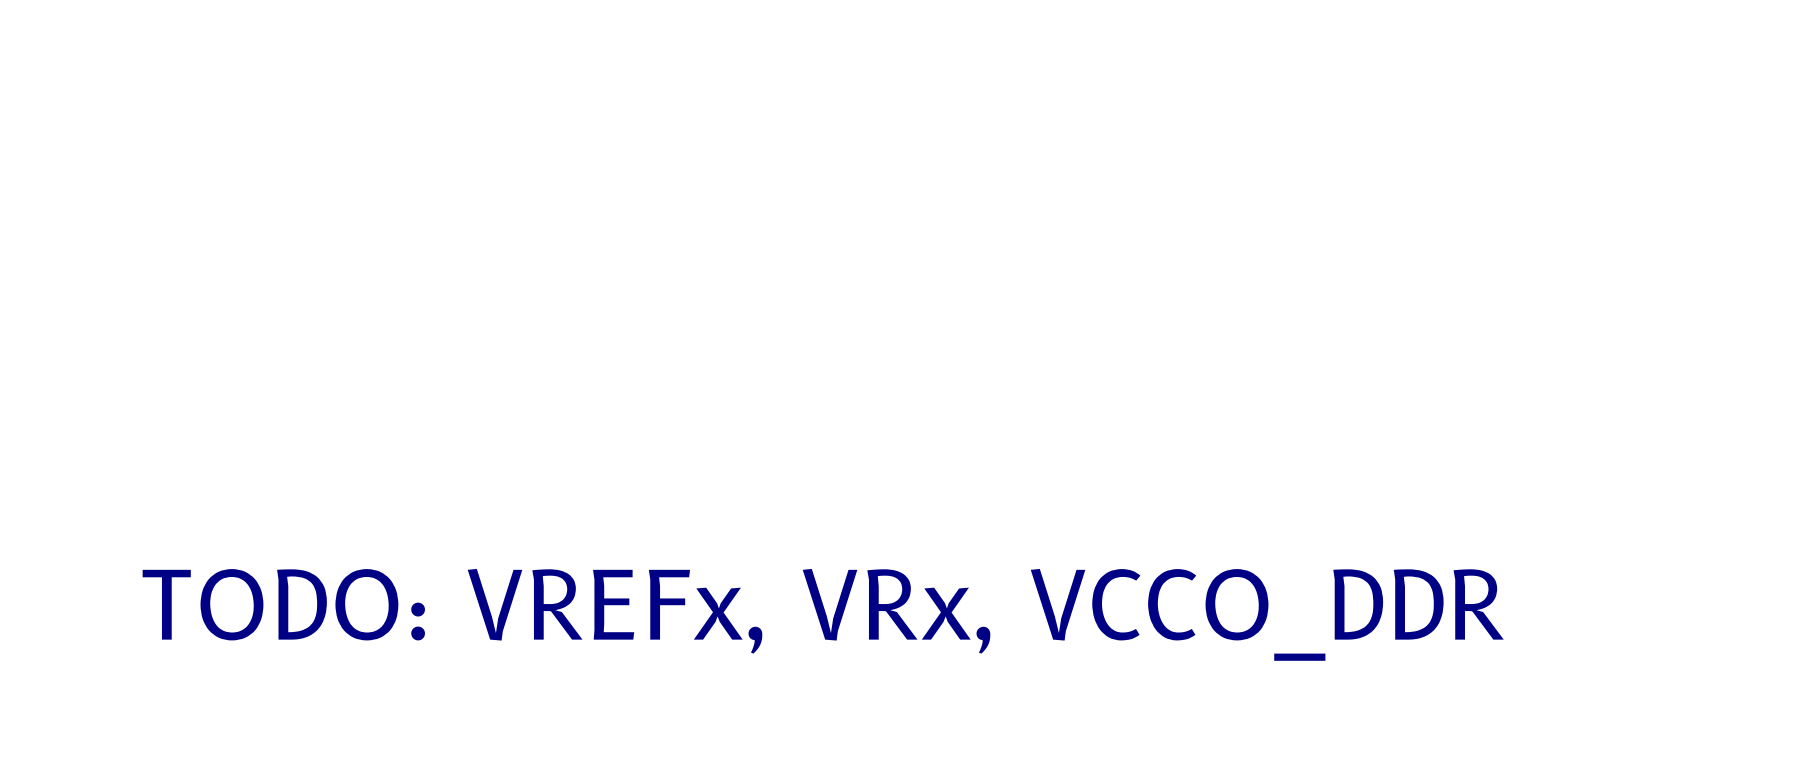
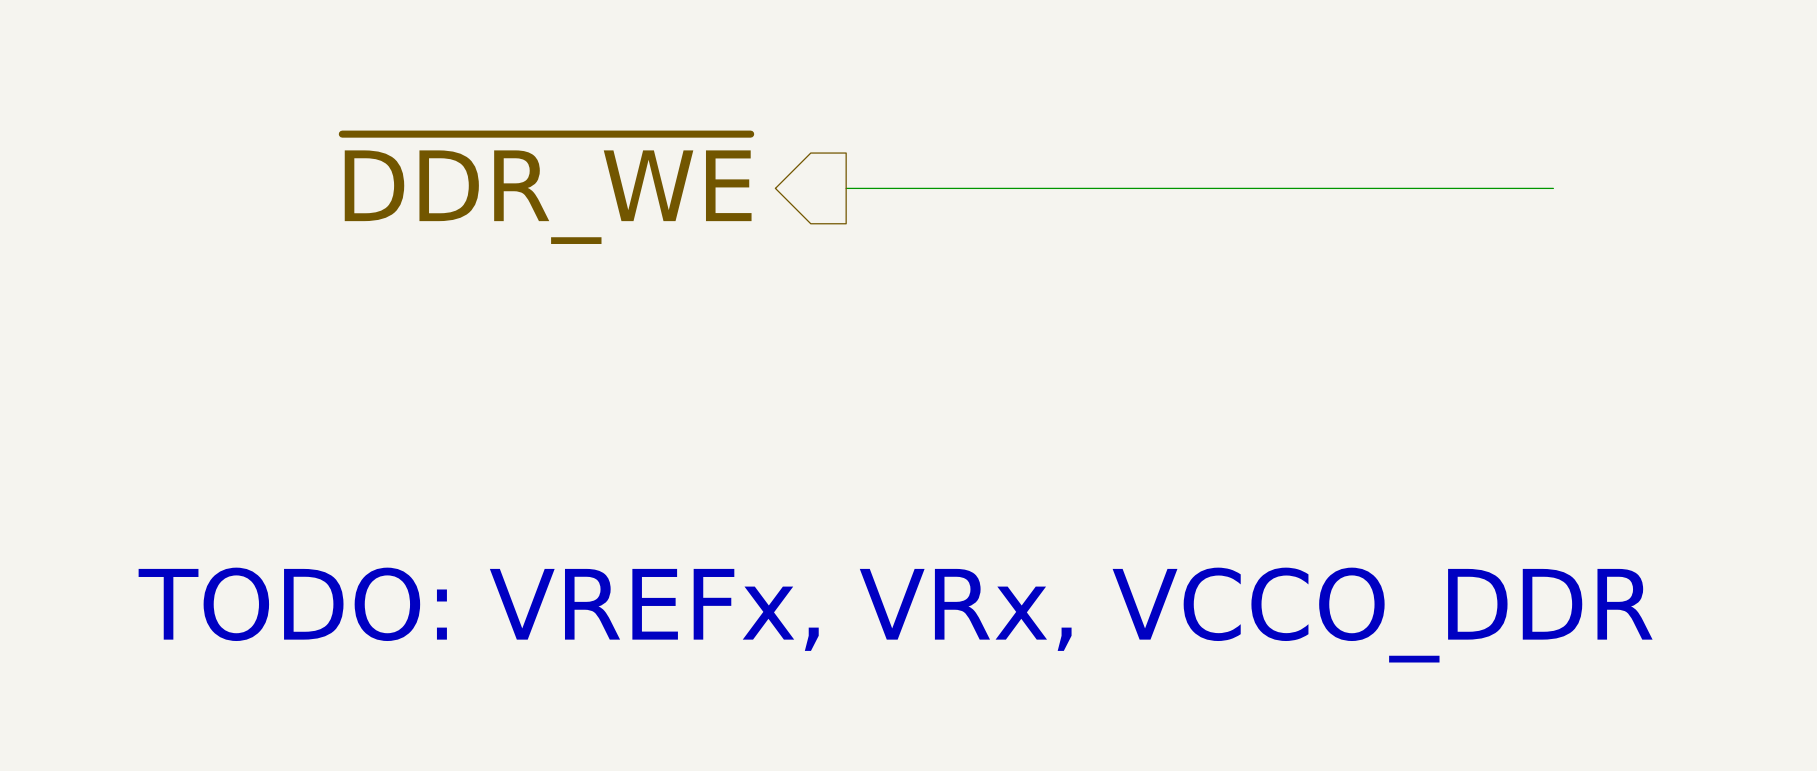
hierarchical label: none -> ~{DDR_WE} (546, 189)
wire: none -> (846, 188) (1553, 188)

